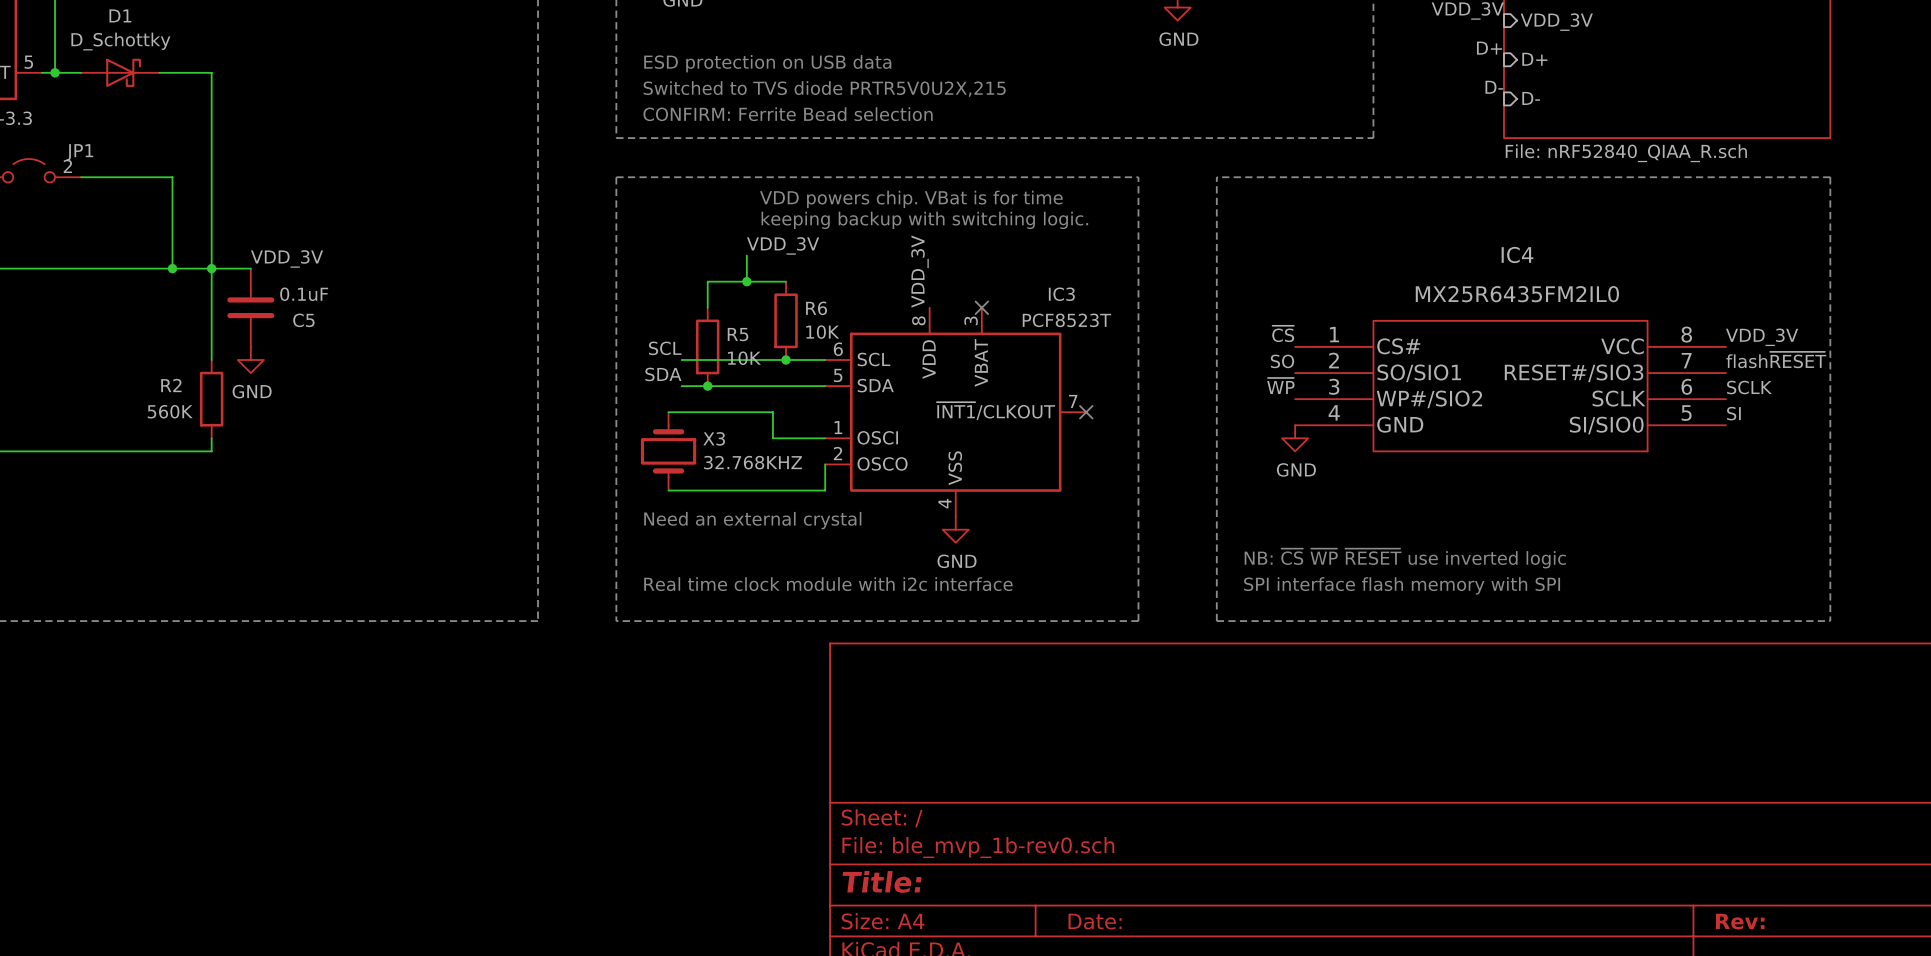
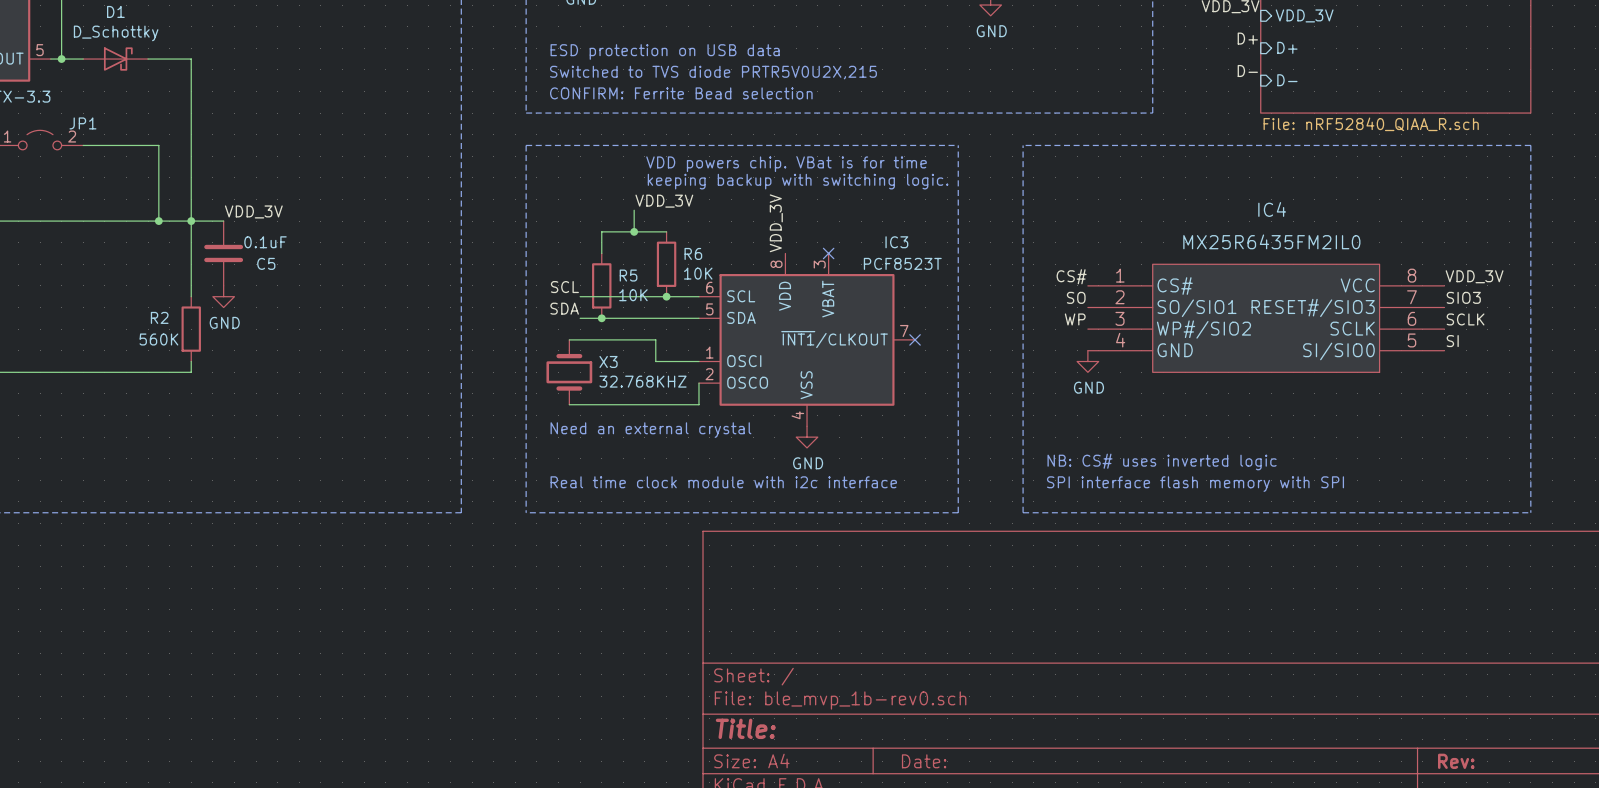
label: ~{CS} (1283, 333) -> CS# (1071, 276)
label: flash~{RESET} (1776, 360) -> SIO3 (1463, 297)
label: ~{WP} (1280, 386) -> WP (1075, 319)
text: NB: ~{CS} ~{WP} ~{RESET} use inverted logic (1405, 558) -> NB: CS# uses inverted logic (1162, 461)

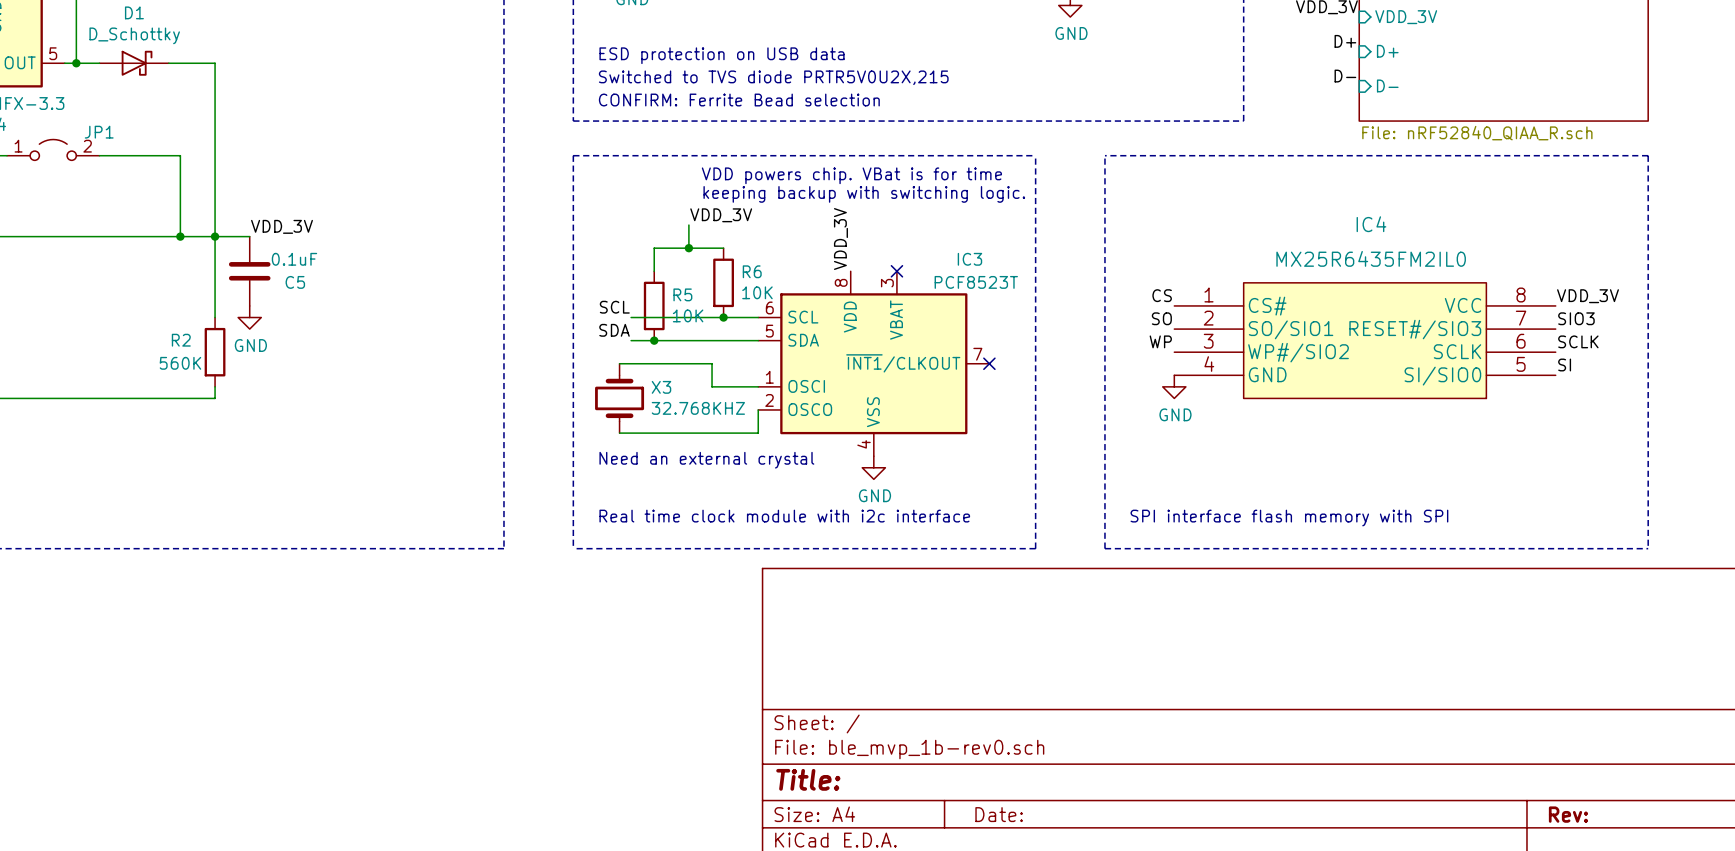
label: CS# (1071, 276) -> CS (1162, 295)
text: NB: CS# uses inverted logic (1162, 461) -> none

